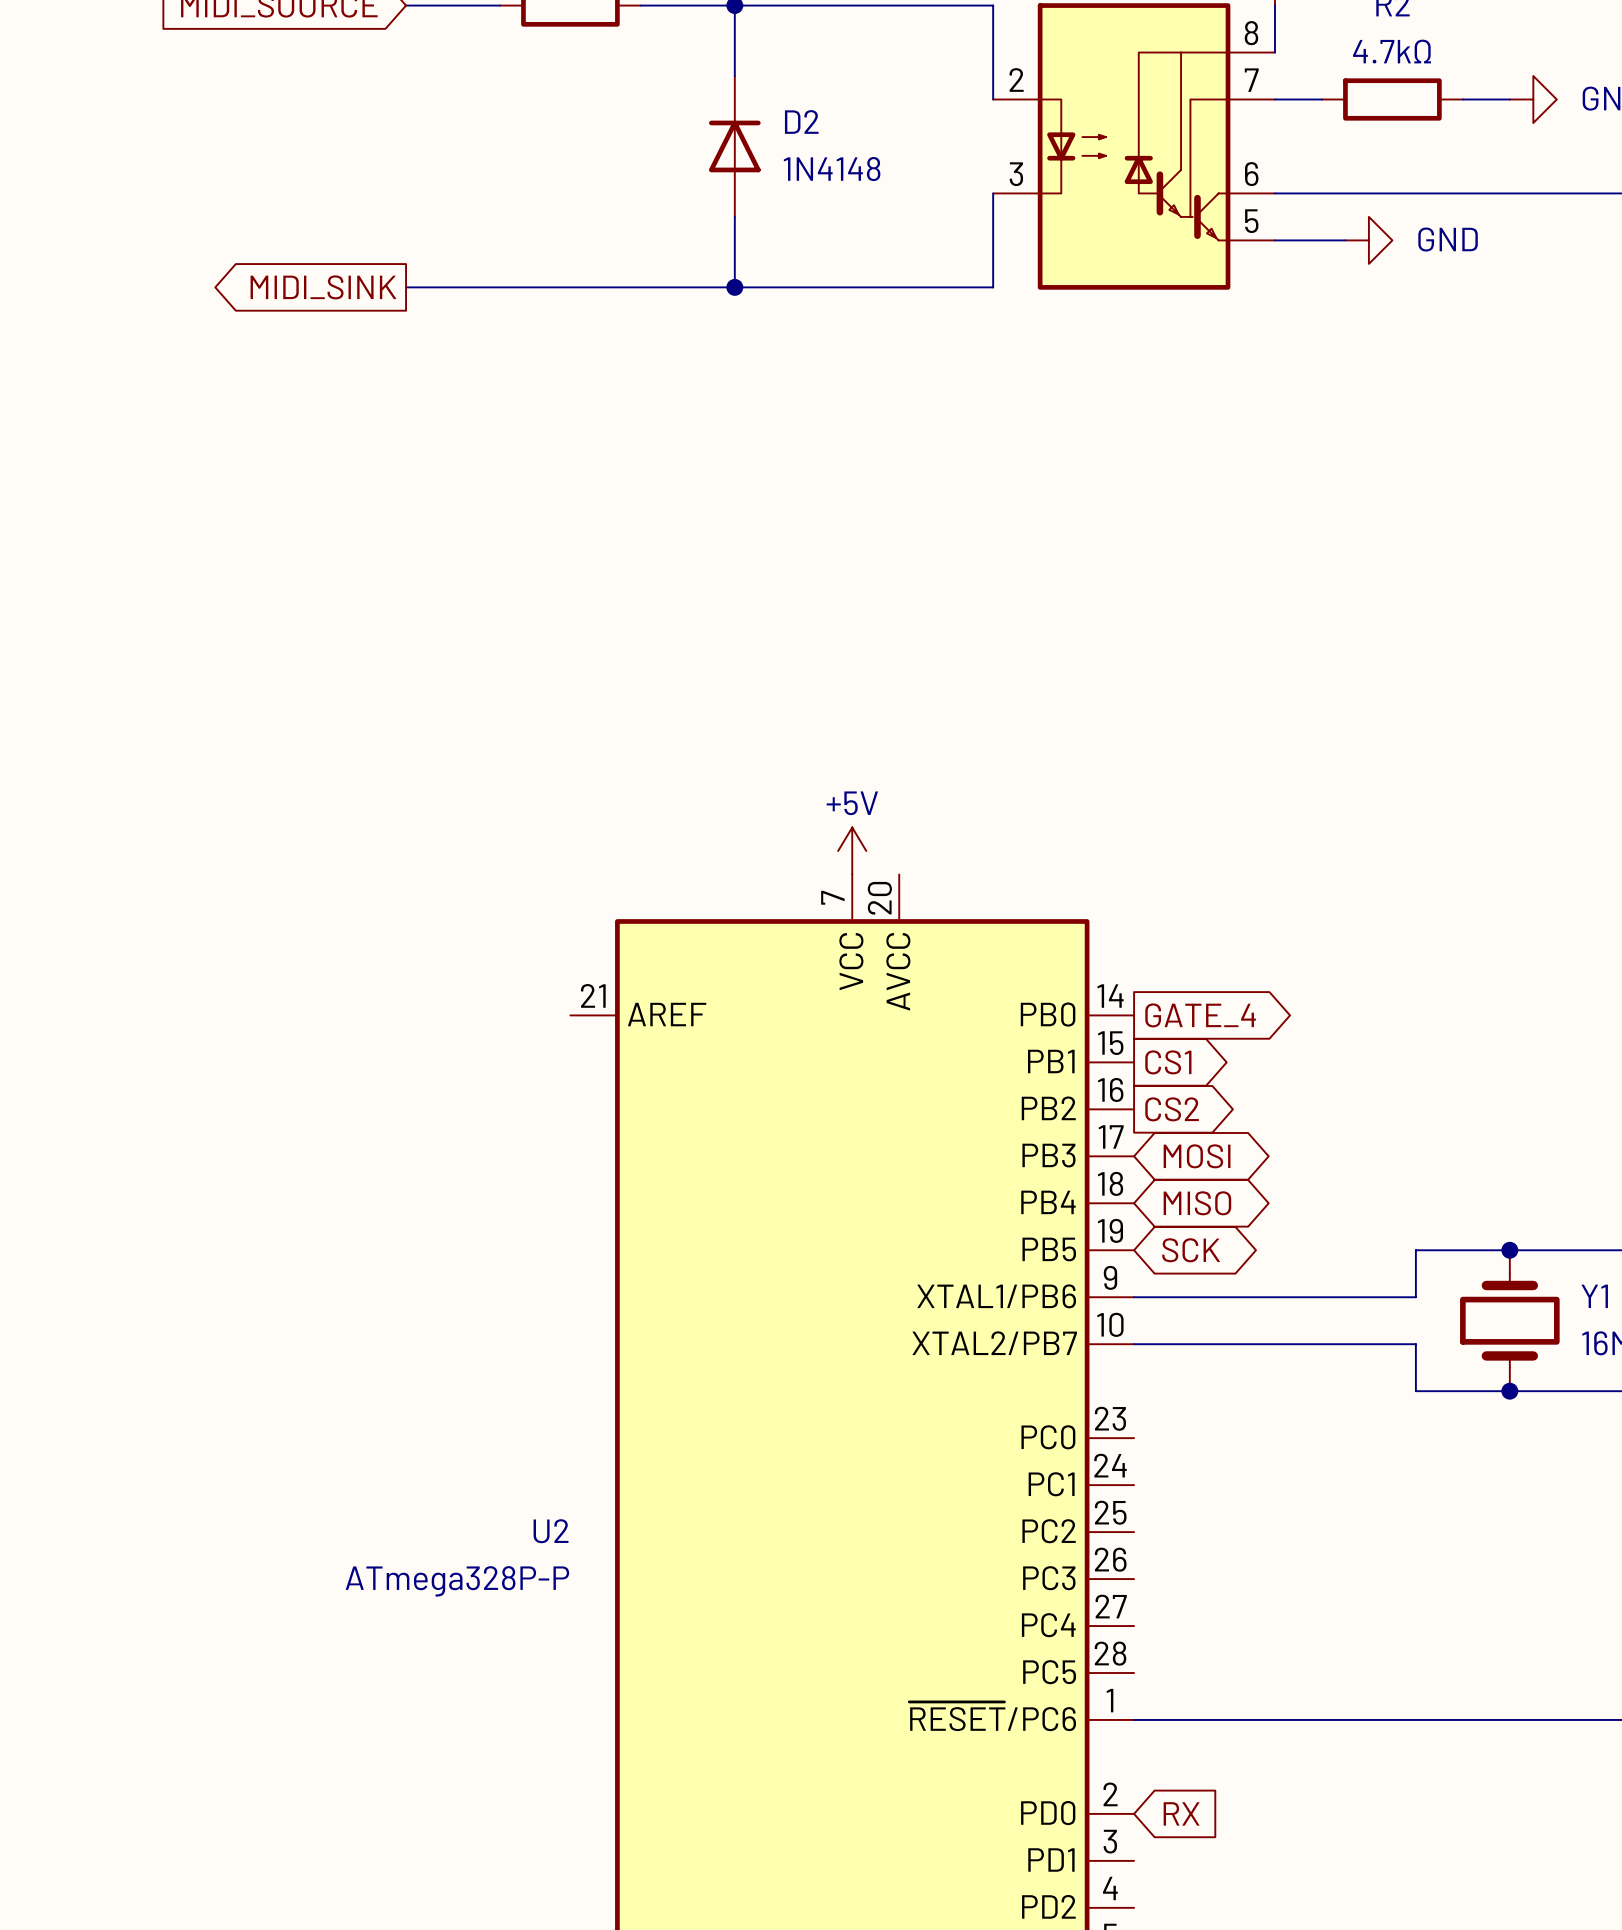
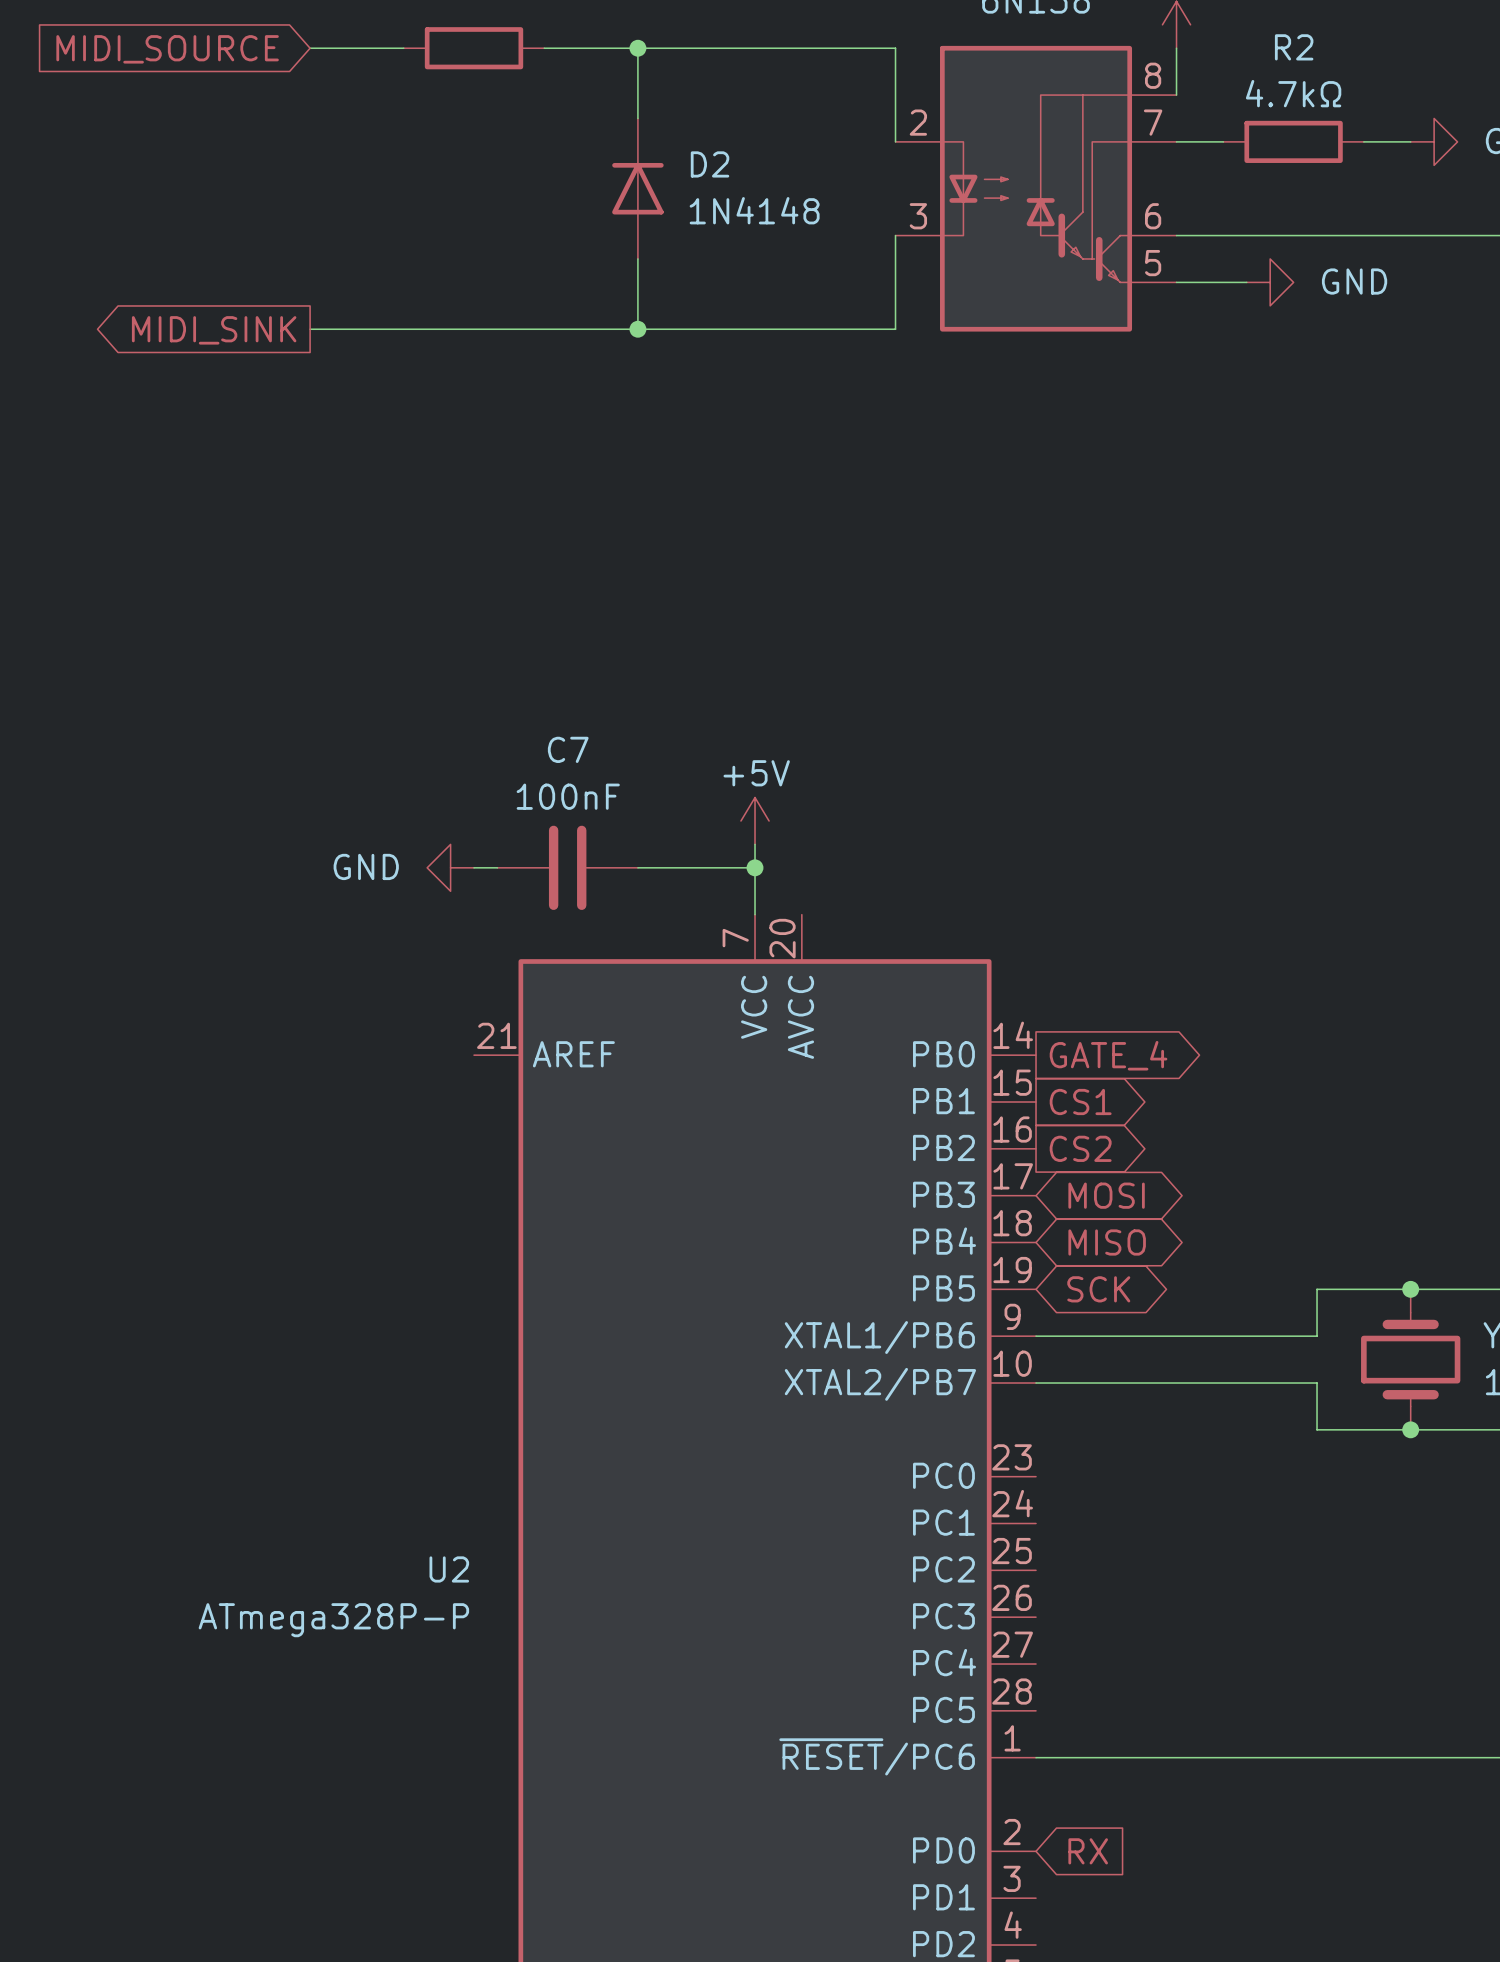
power symbol: none -> GND (450, 867)
wire: none -> (474, 867) (497, 867)
C7: none -> 100nF (567, 867)
wire: none -> (637, 867) (755, 867)
junction: none -> (755, 867)
power symbol position: +5V (852, 851) -> +5V (755, 820)

